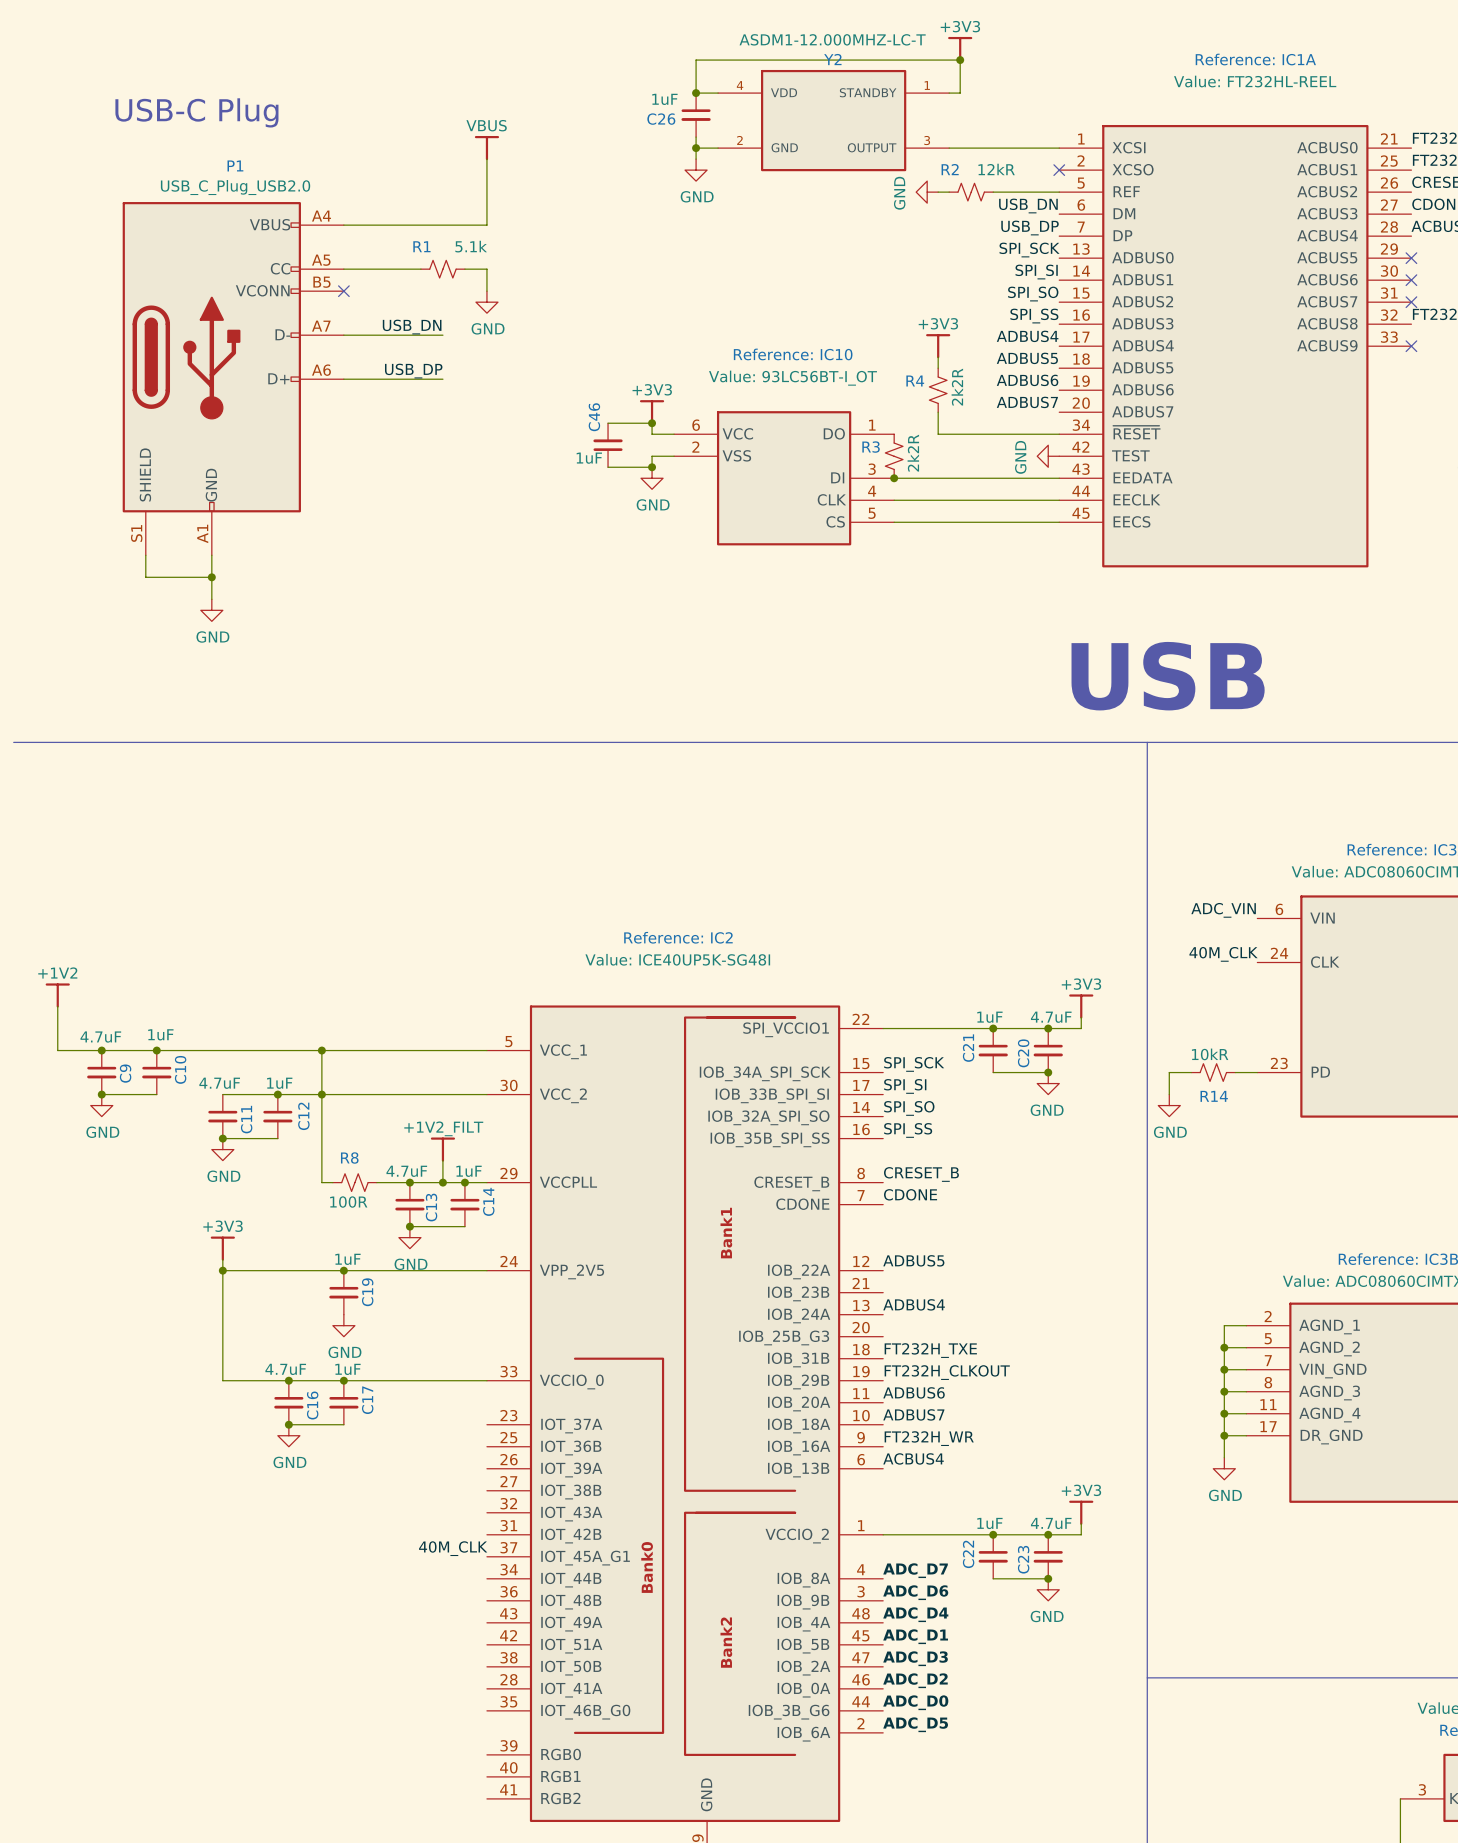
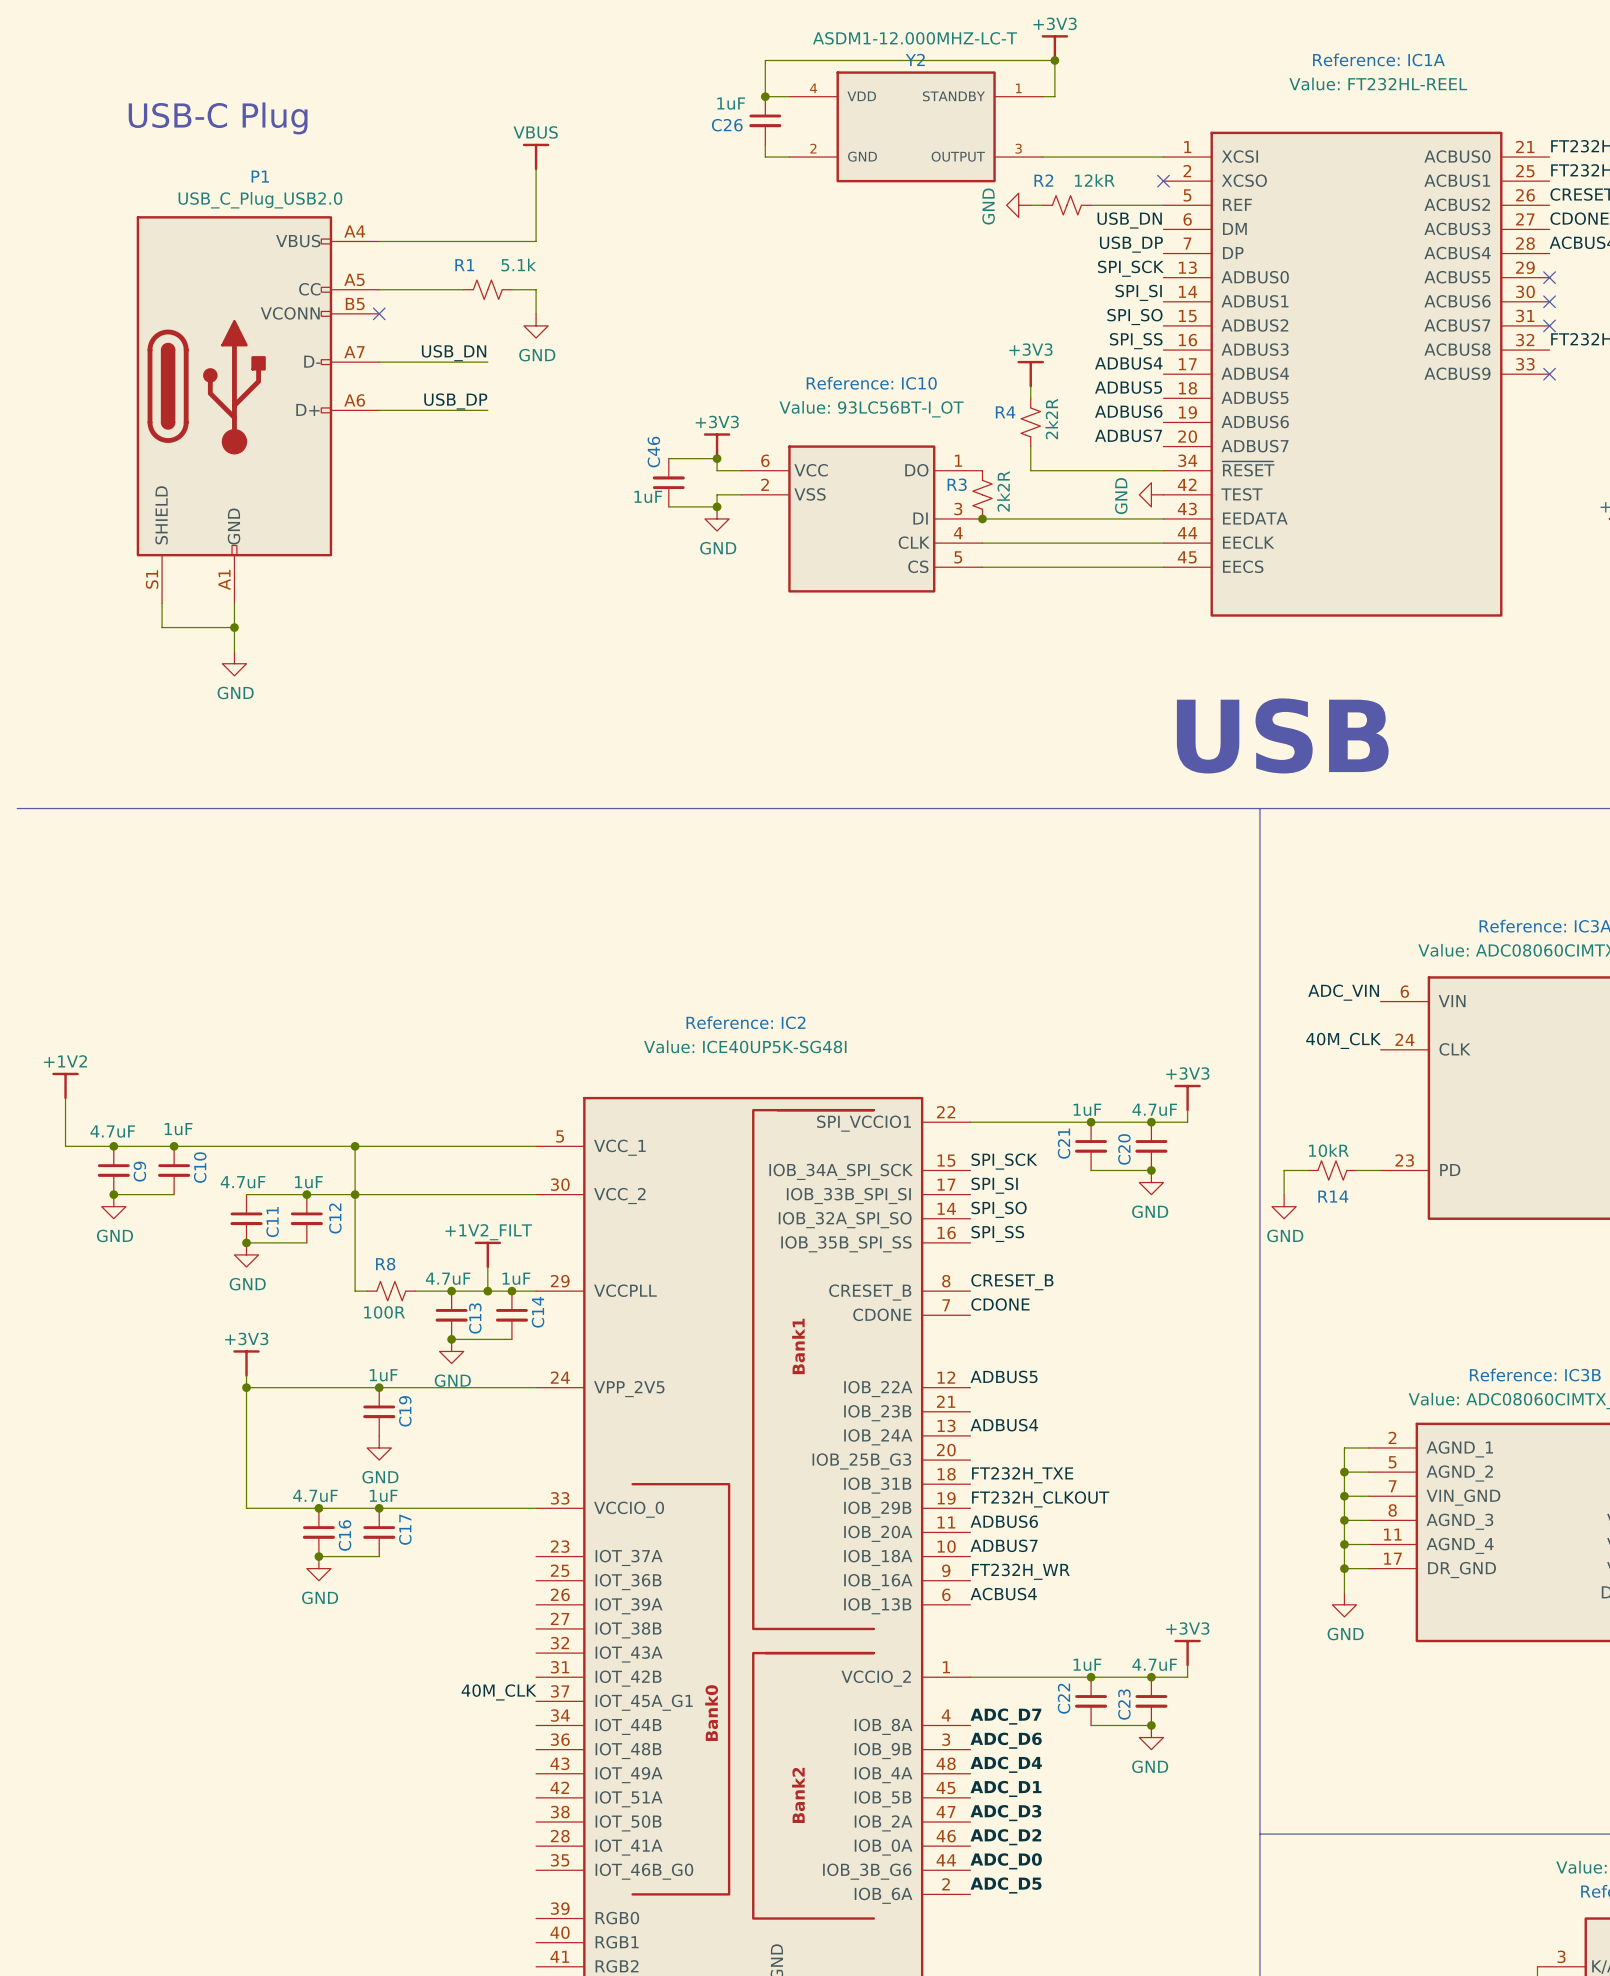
wire: (696, 148) (696, 159) -> none
junction: (696, 148) -> none
power symbol: GND (696, 170) -> none

